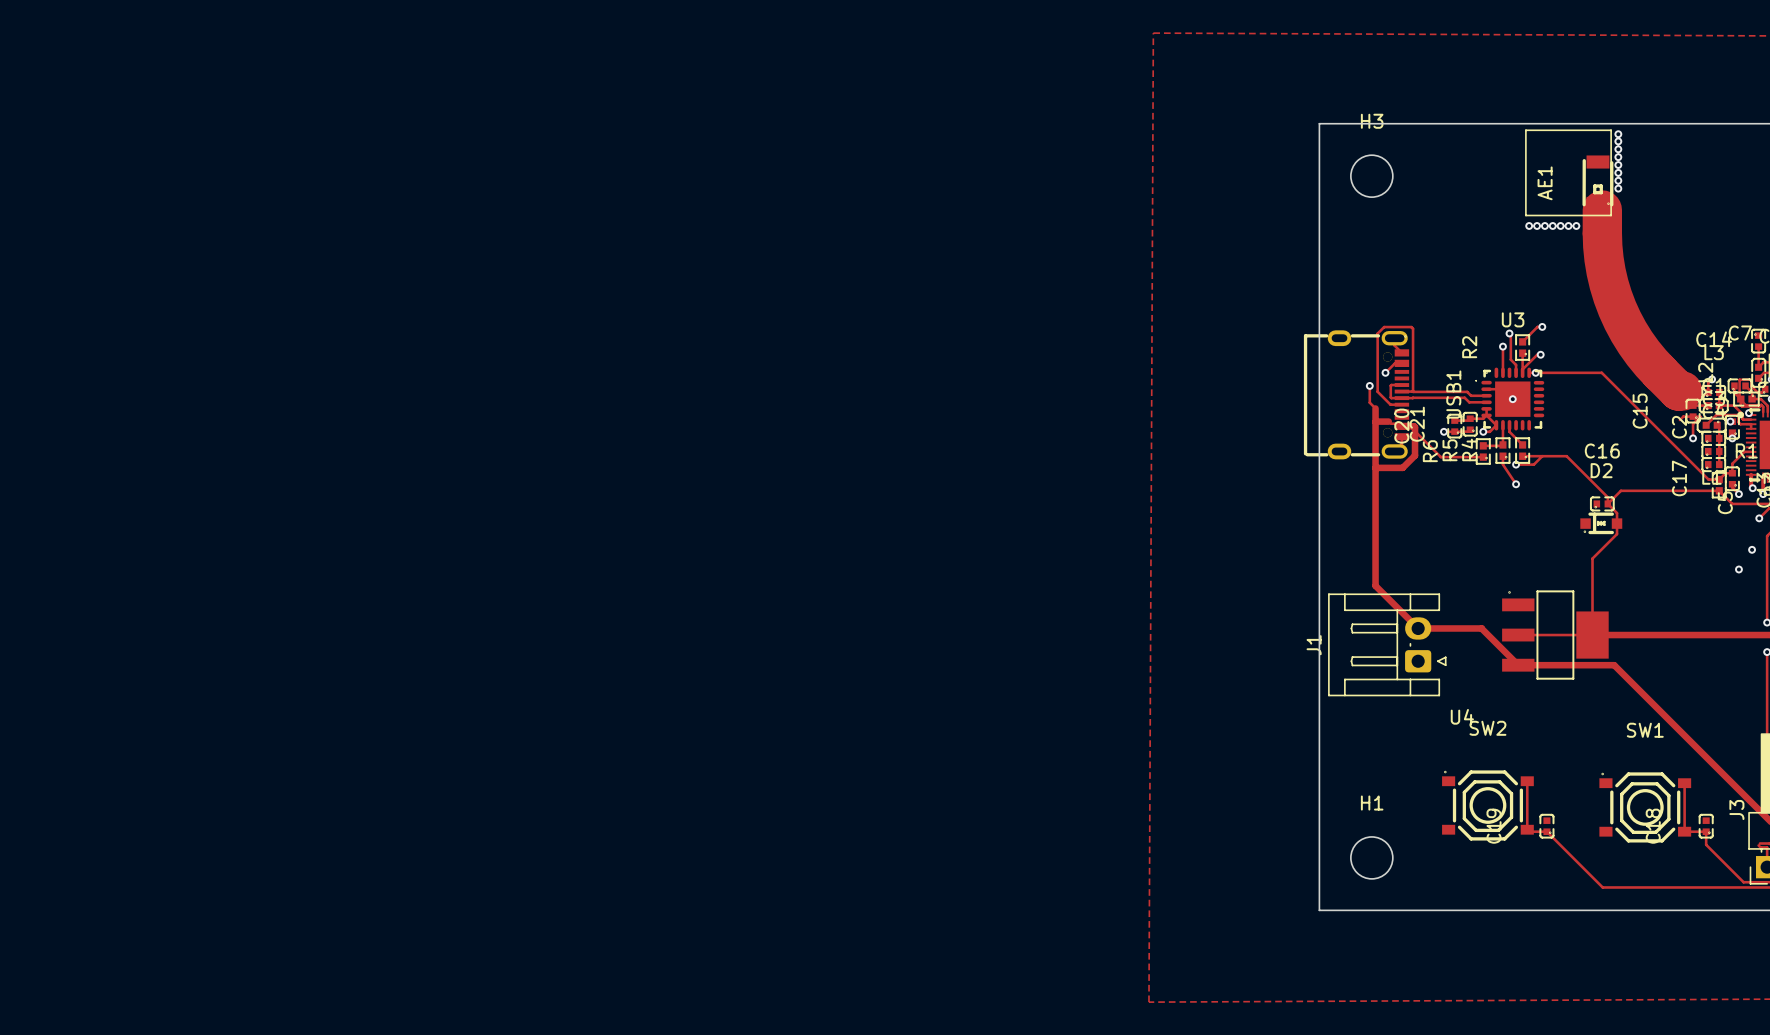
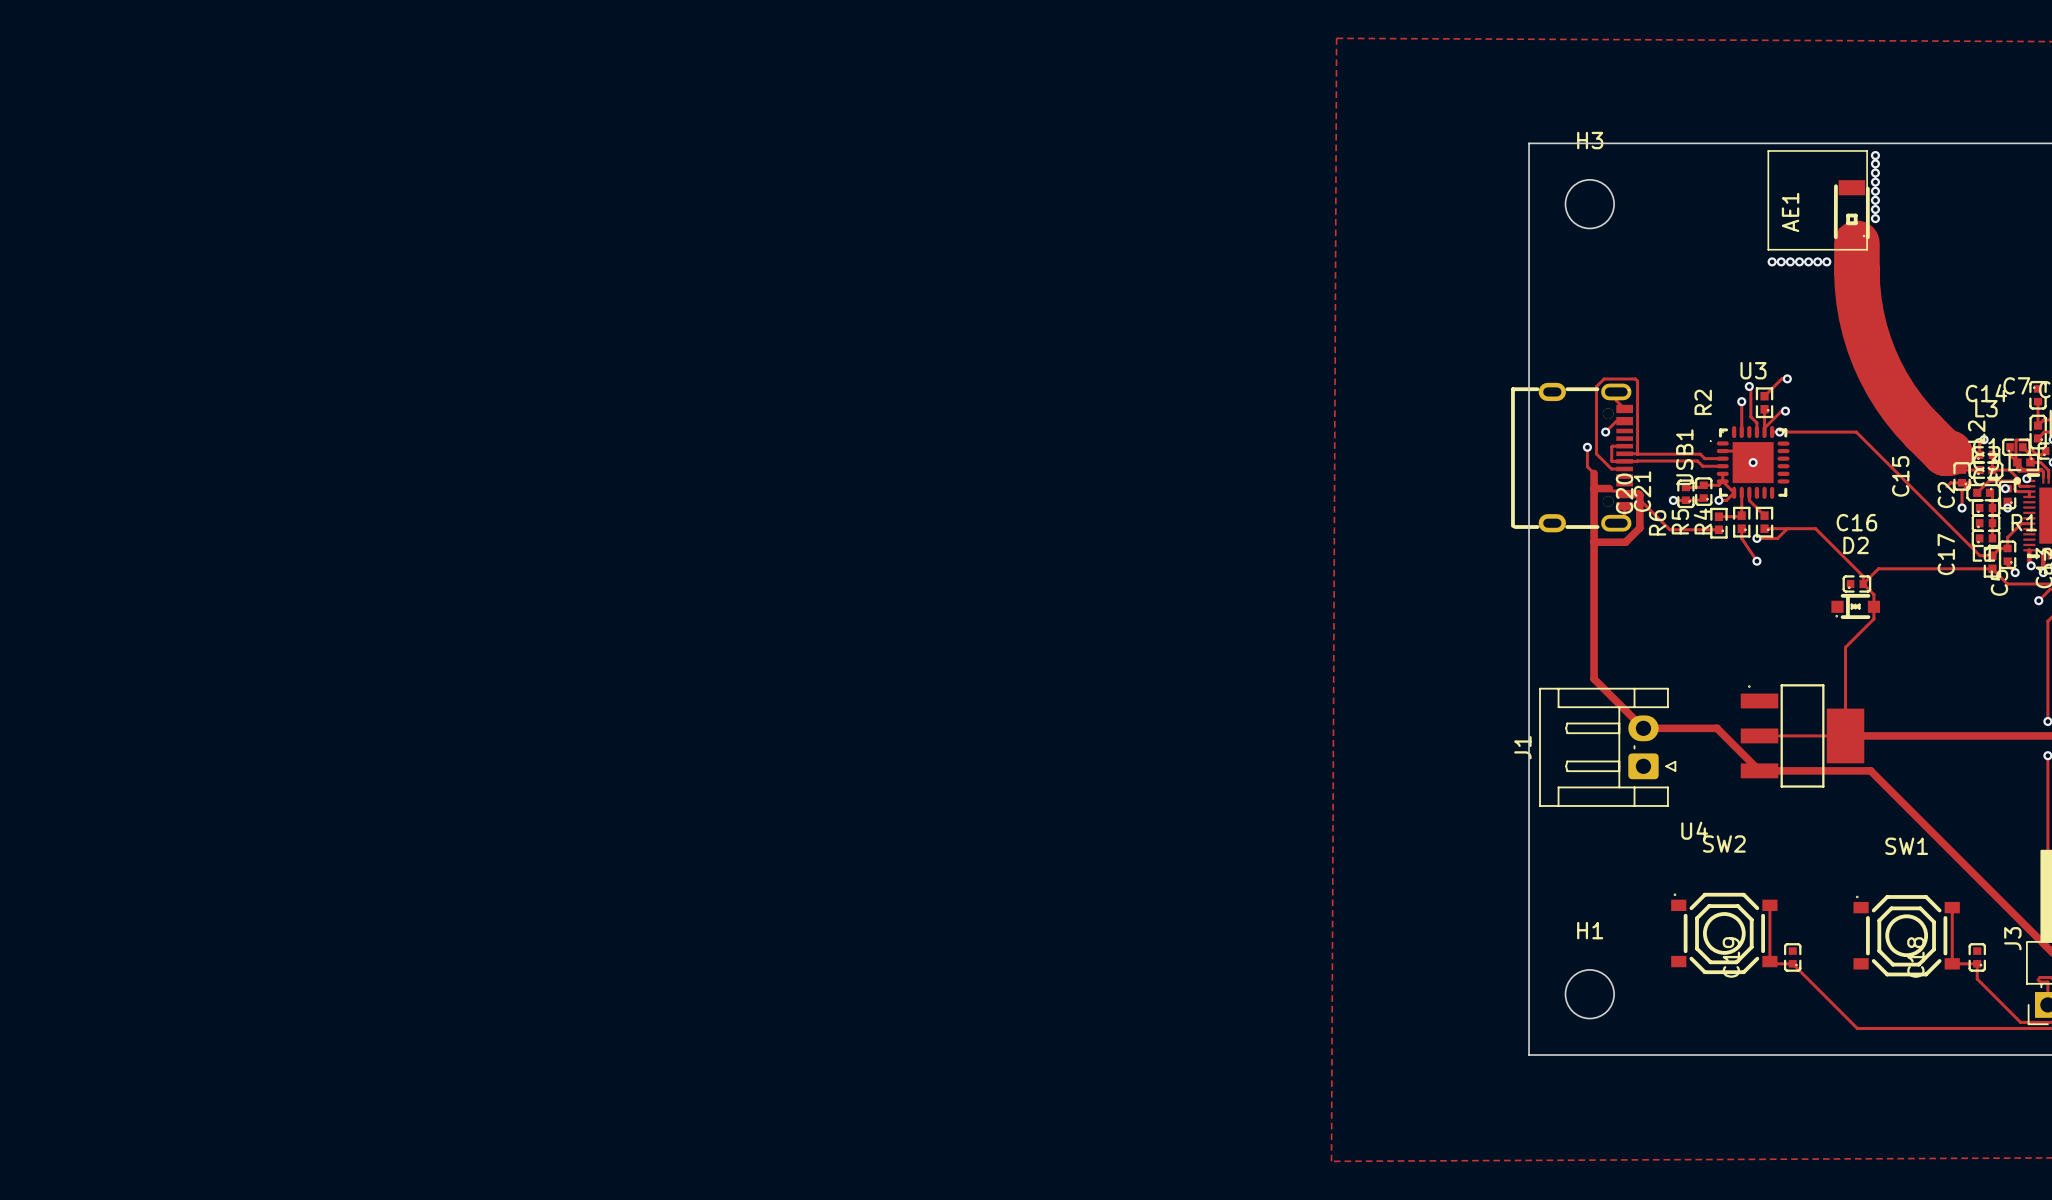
via: (1752, 549) -> none
via: (1738, 569) -> none

